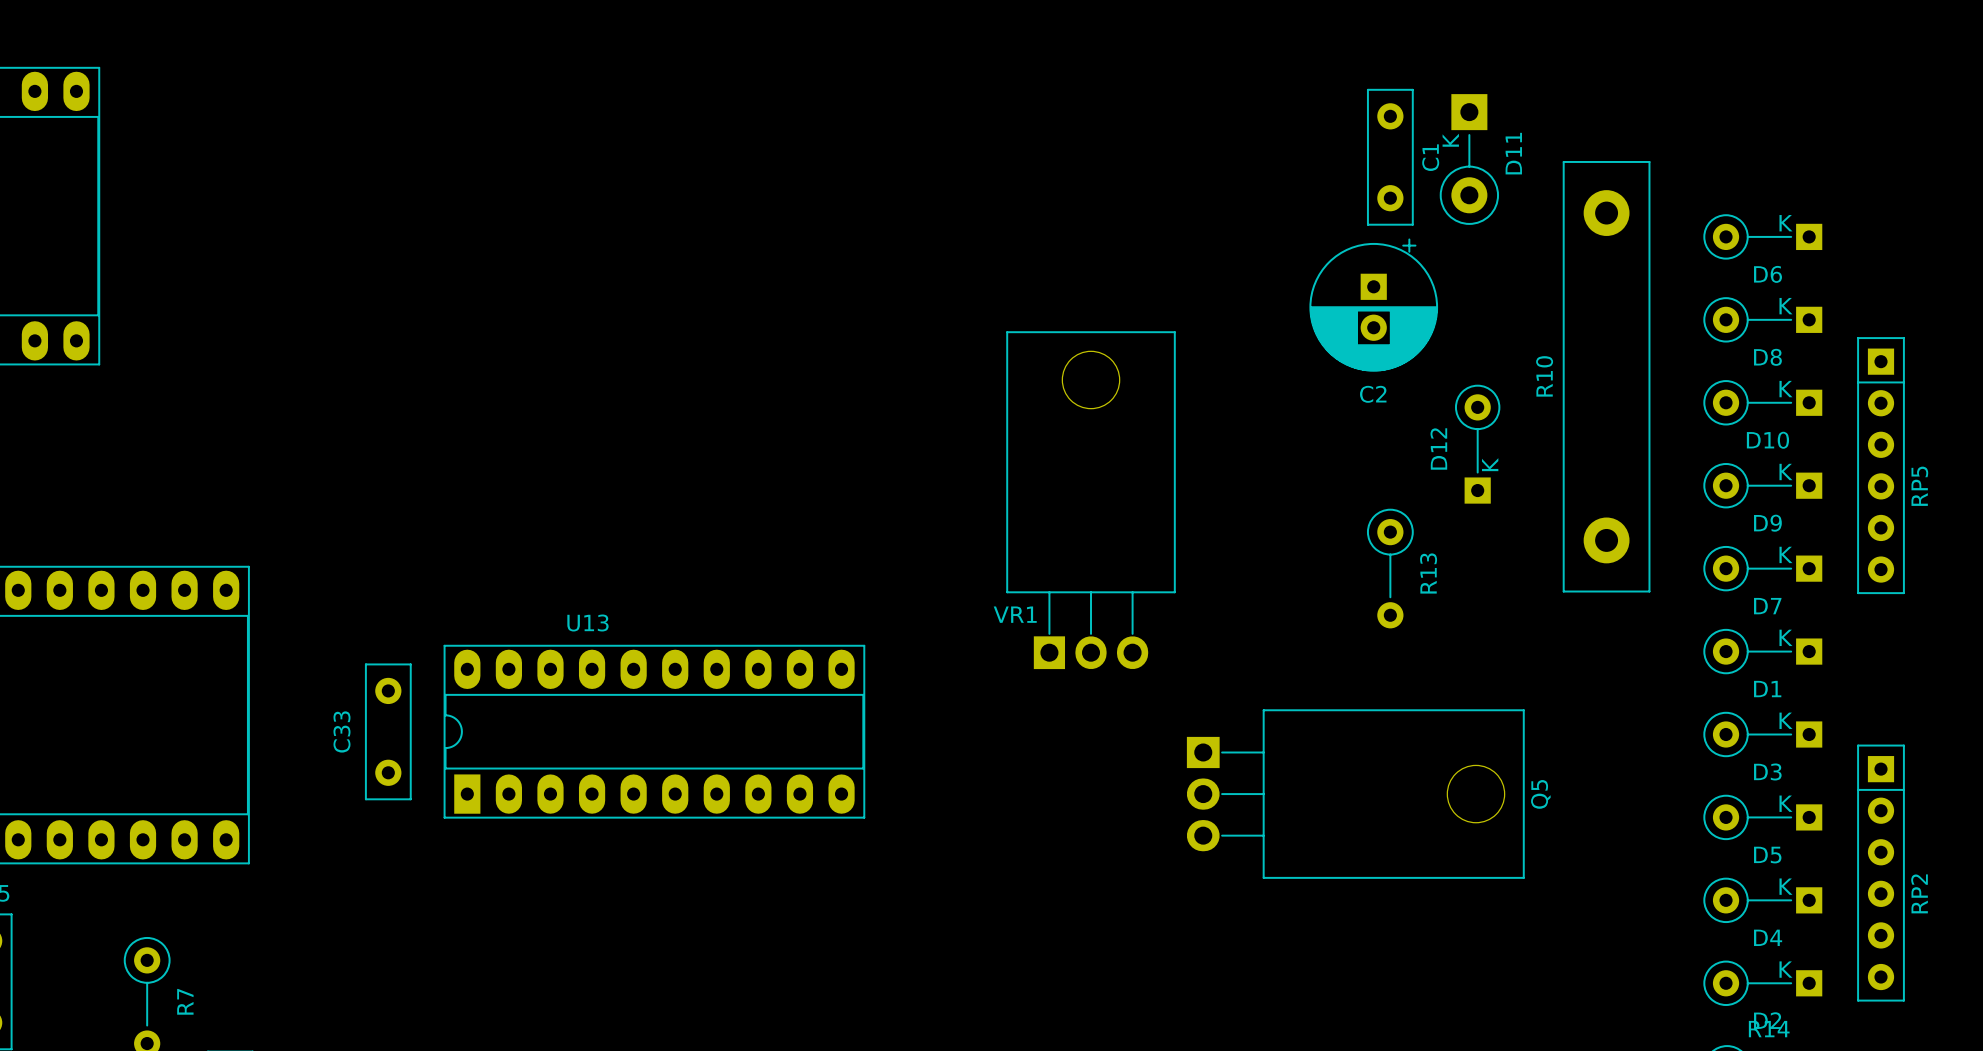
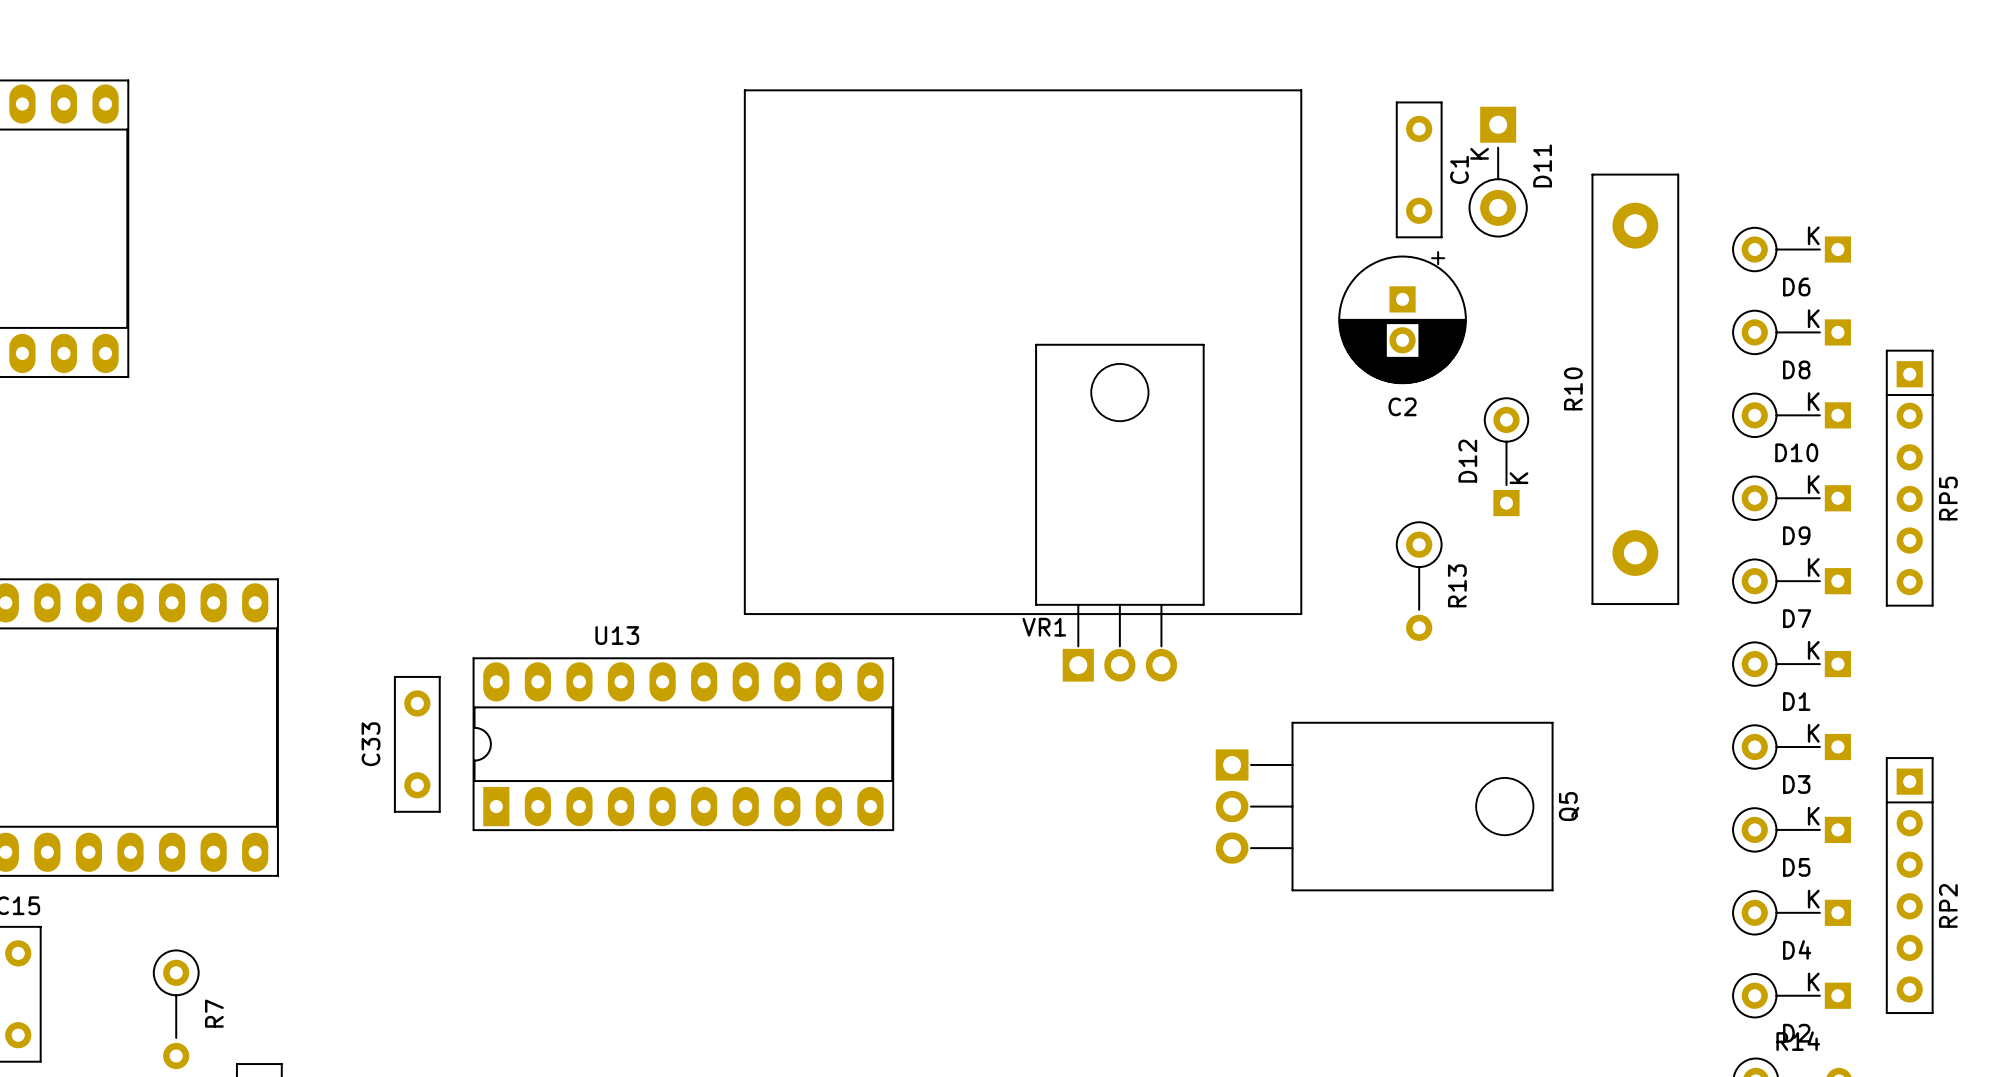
line: none -> (744, 90) (1301, 90) (1301, 614) (744, 614) (744, 90)

